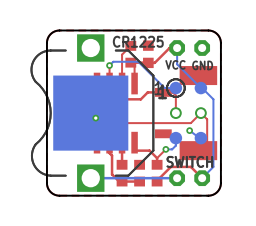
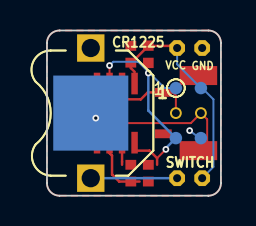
top track: (130, 45) (122, 54) (122, 83) -> none
top track: (177, 48) (169, 48) (154, 62) (130, 62) (134, 66) (134, 71) -> (177, 48) (175, 45) (148, 45) (130, 62) (130, 68) (134, 71)
bottom track: none -> (148, 73) (148, 110) (175, 138) (165, 148)
via: none -> (148, 73)
bottom track: (175, 138) (175, 145) (172, 149) (165, 149) -> none
part: (122, 173) -> none
part: none -> (130, 173)
part: (139, 173) -> none
part: none -> (148, 173)
part: (157, 173) -> none
top track: (202, 178) (190, 166) (170, 166) (157, 181) -> none

